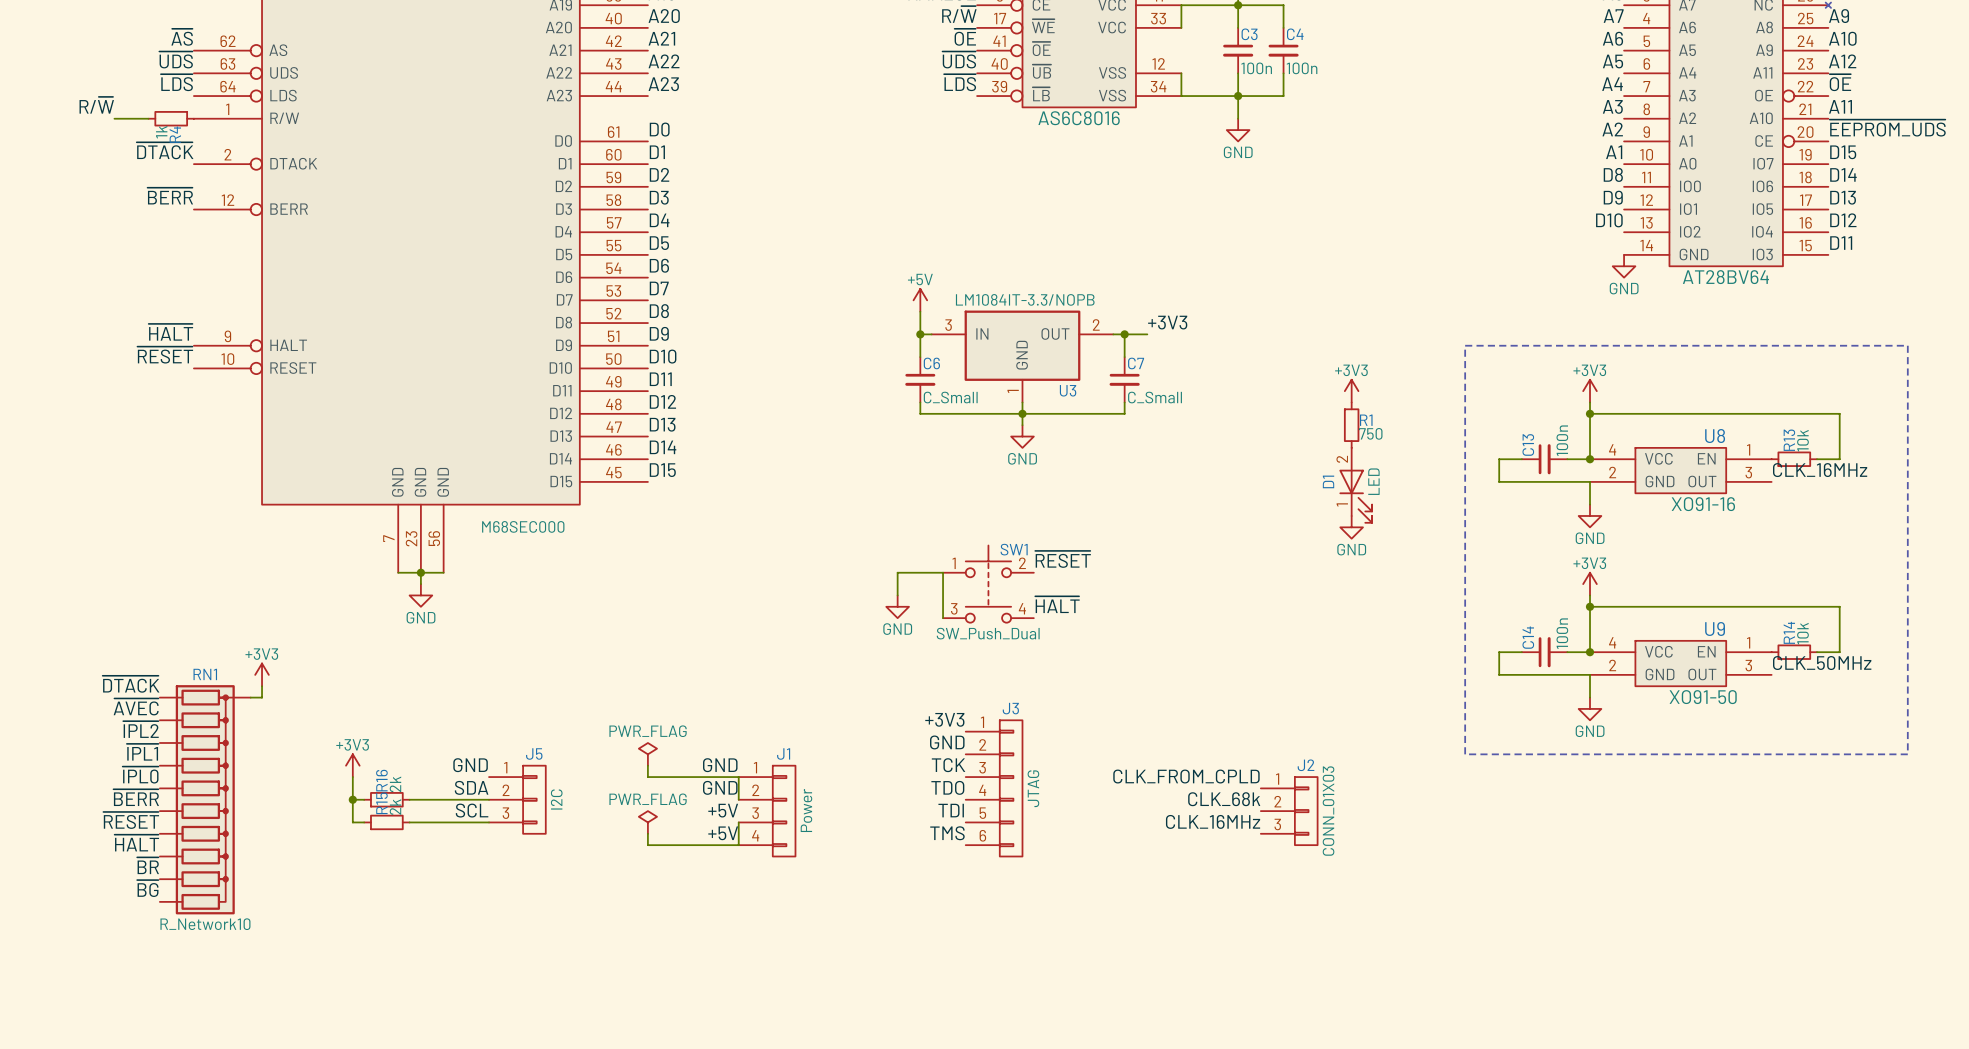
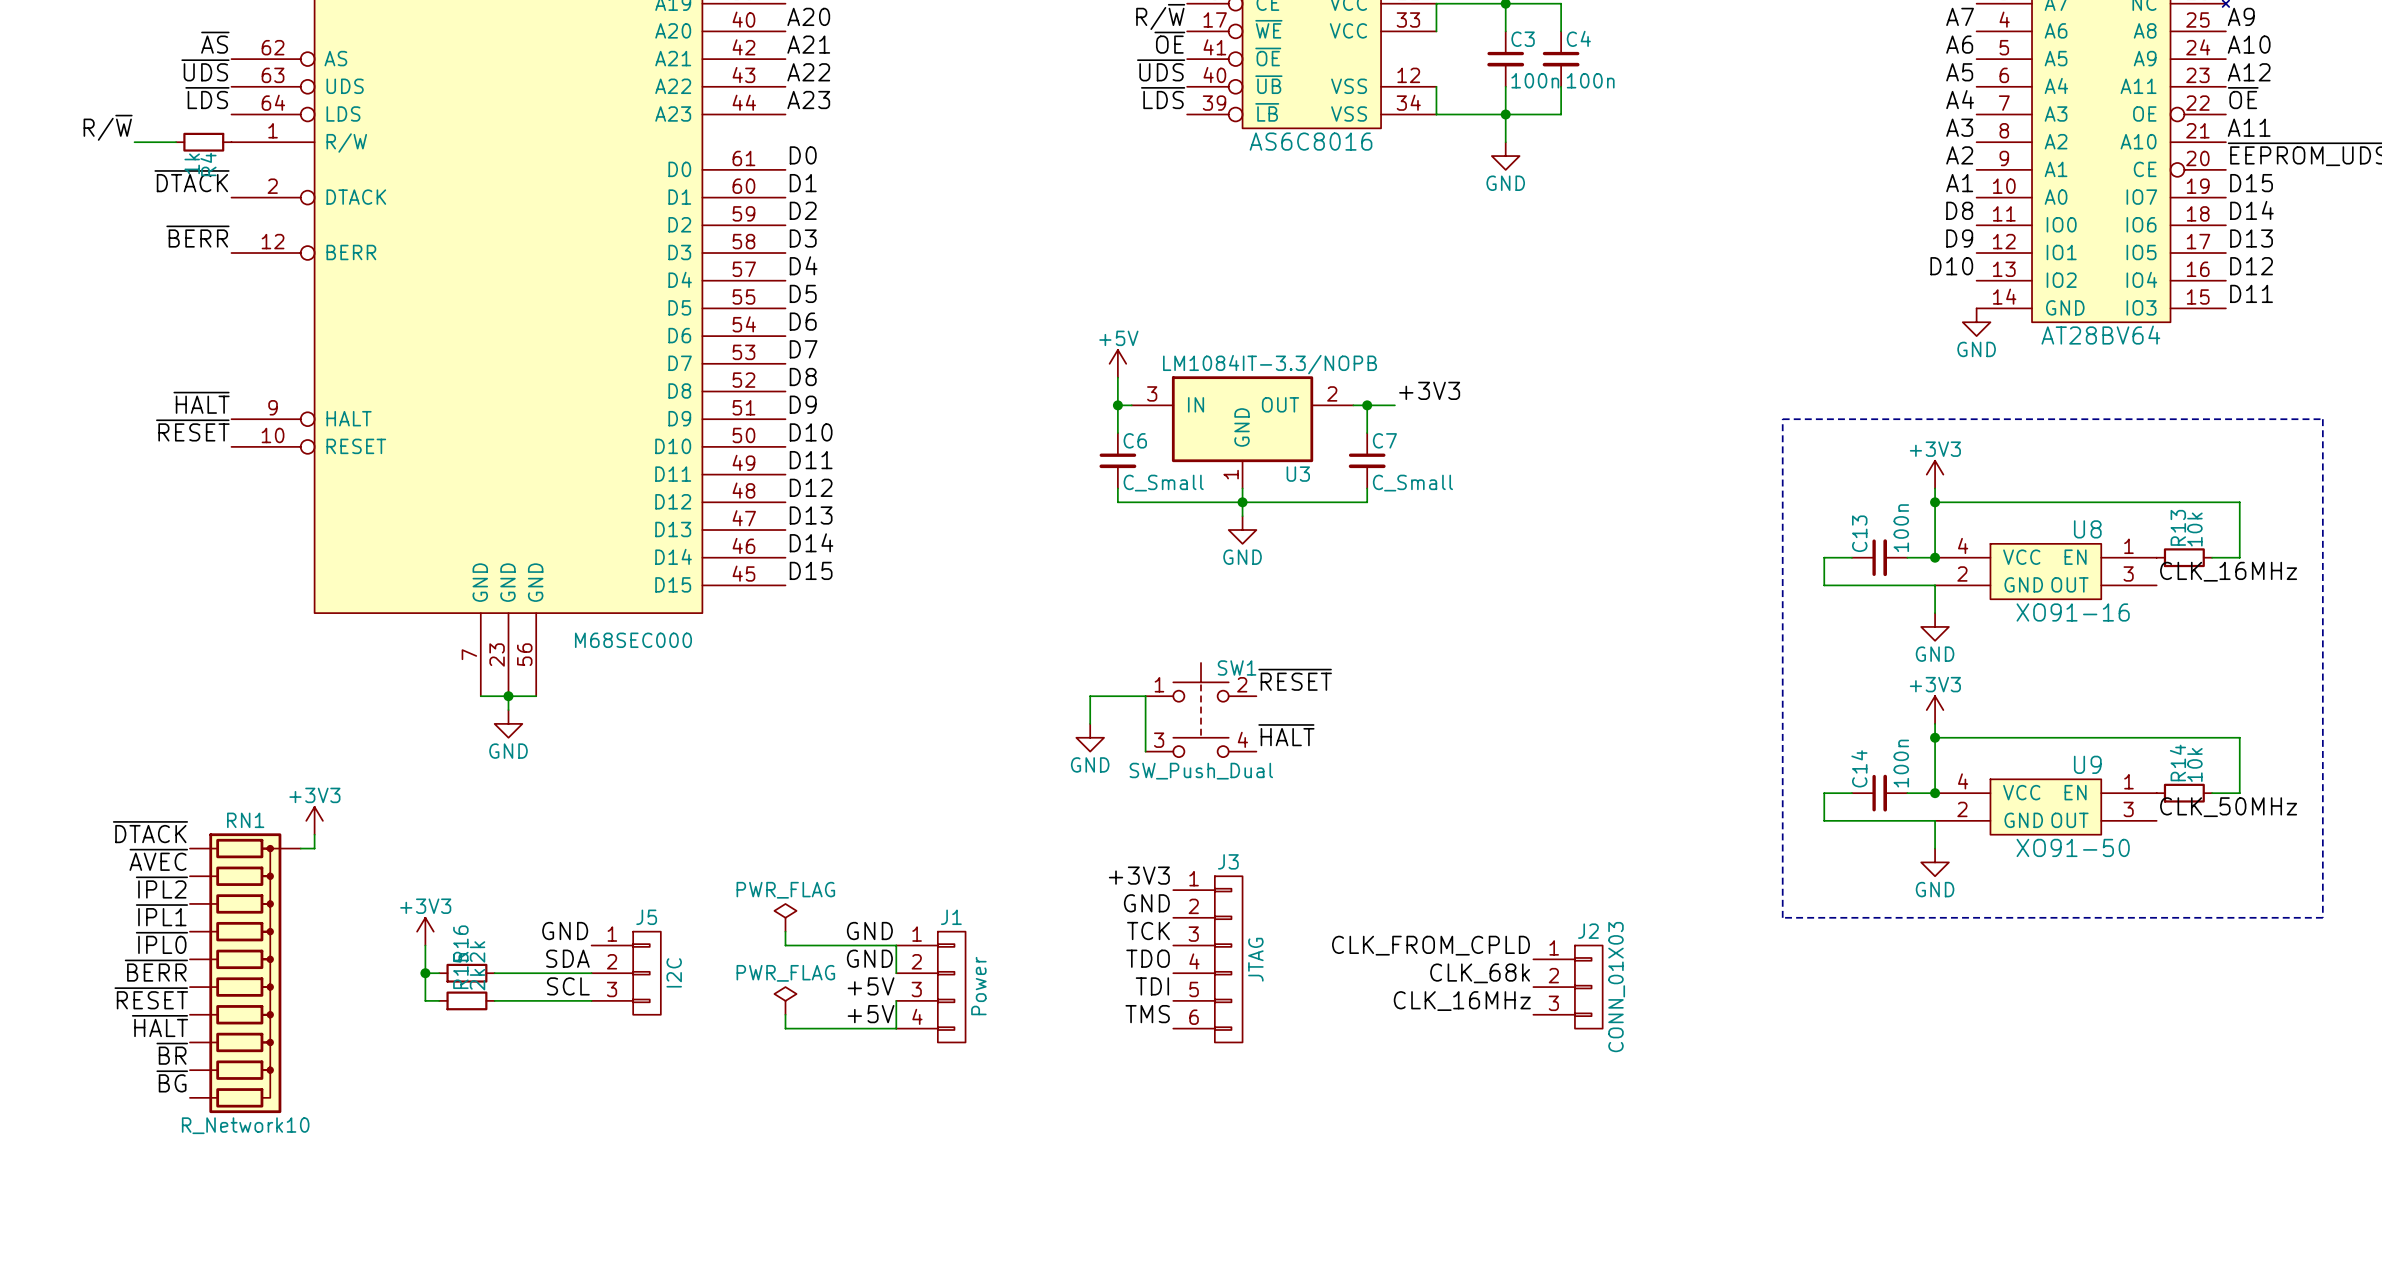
power symbol: +3V3 (1351, 391) -> none
R1: 750 (1351, 425) -> none
D1: LED (1355, 485) -> none
power symbol: GND (1351, 527) -> none

